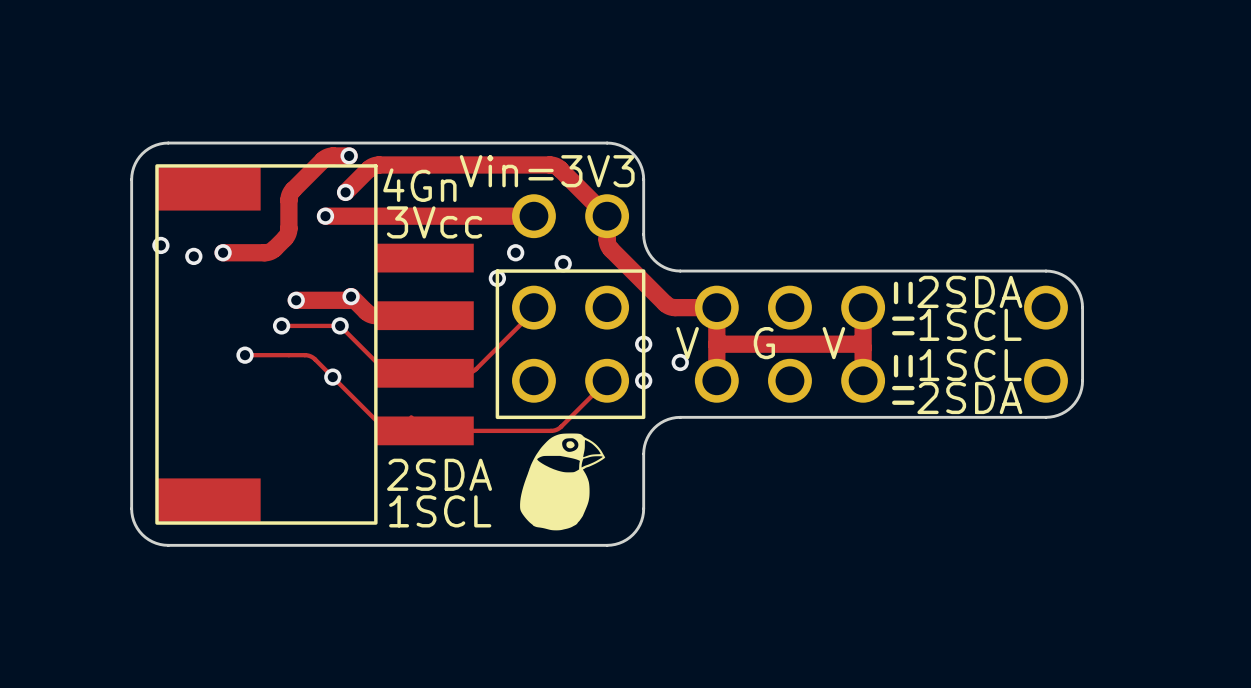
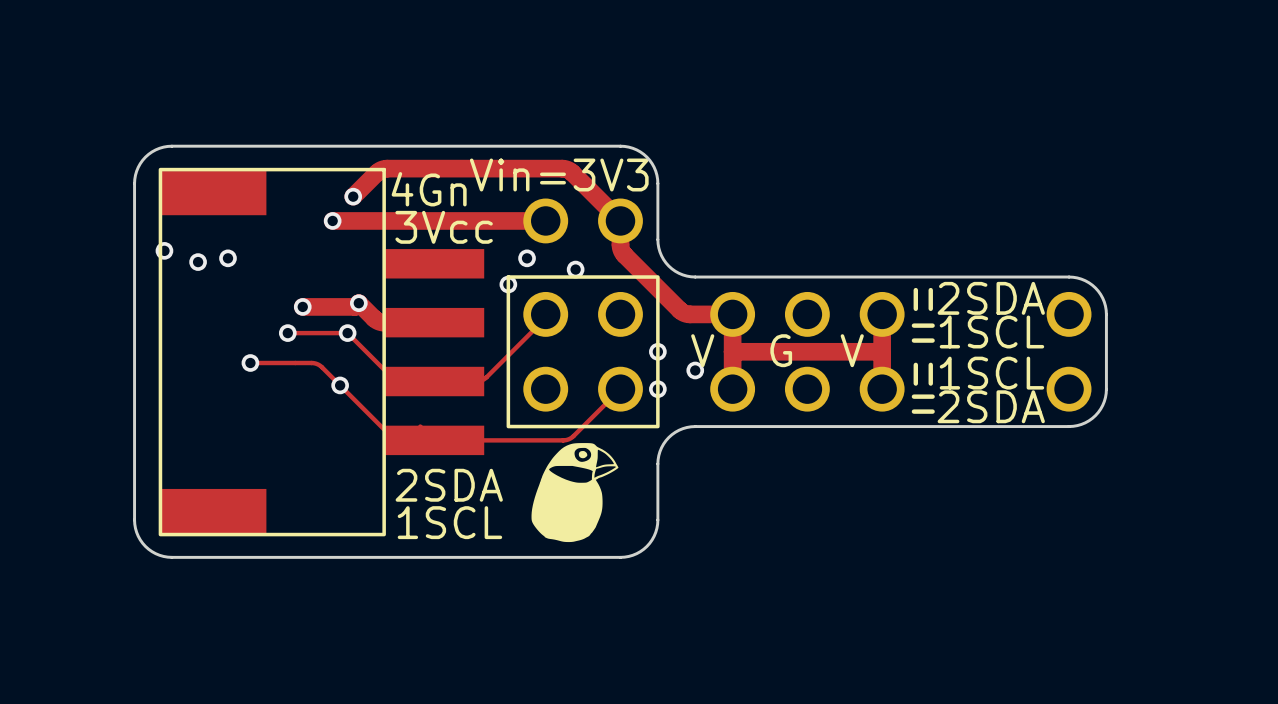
track: (349, 155) (331, 156) (325, 158) (291, 191) (289, 198) (288, 232) (273, 249) (264, 252) (223, 252) -> none
via: (349, 155) -> none

